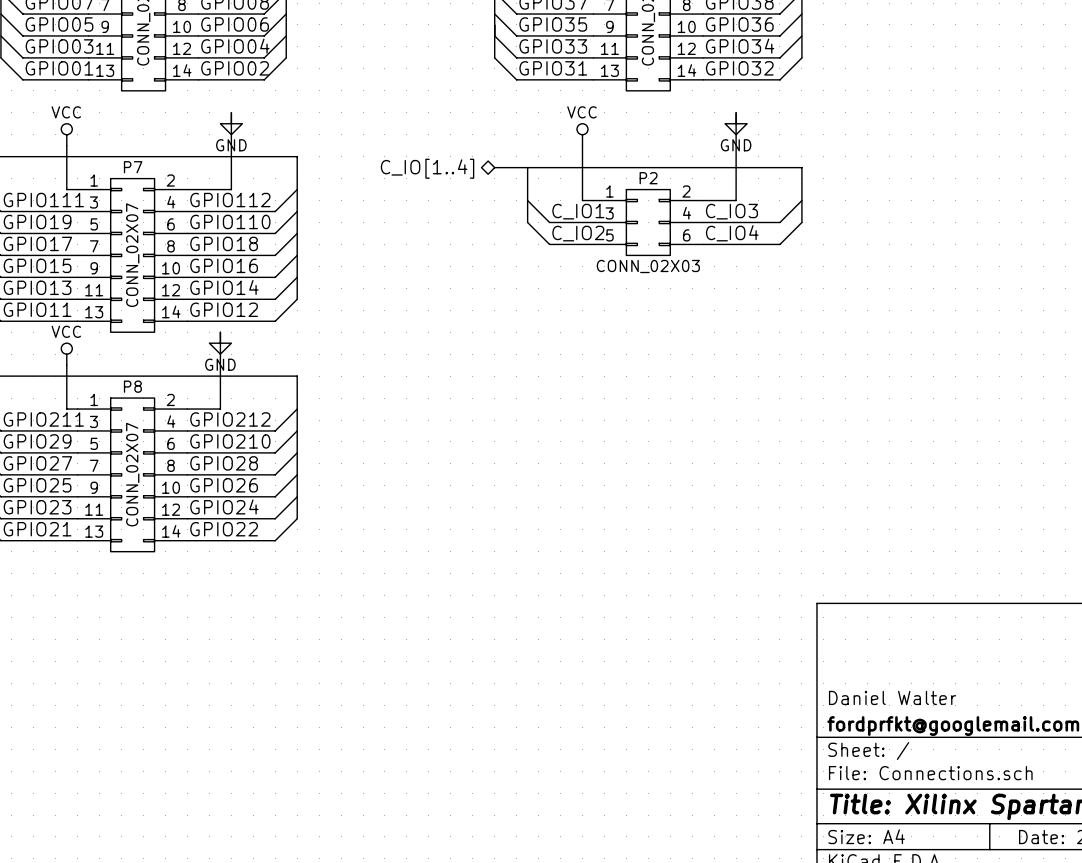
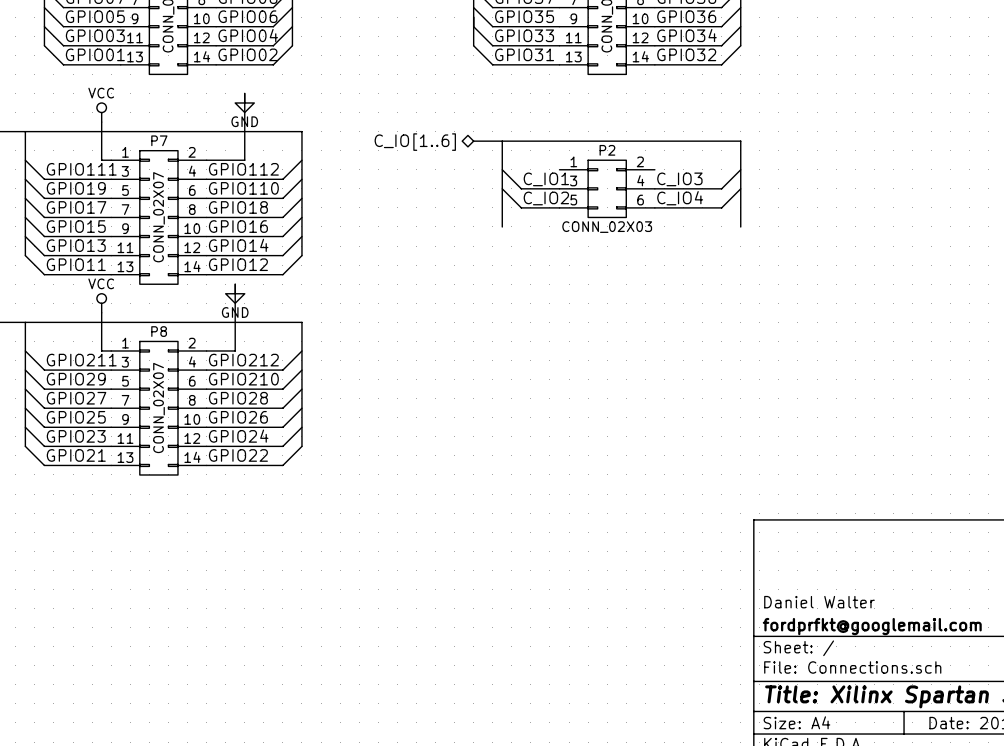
wire: (736, 112) (736, 200) (703, 200) -> none
power symbol: GND (736, 123) -> none
power symbol: VCC (582, 134) -> none
wire: (582, 145) (582, 200) (593, 200) -> none
hierarchical label: C_IO[1..4] (427, 168) -> C_IO[1..6] (415, 142)
bus: none -> (502, 188) (502, 226)
bus: none -> (740, 188) (740, 226)

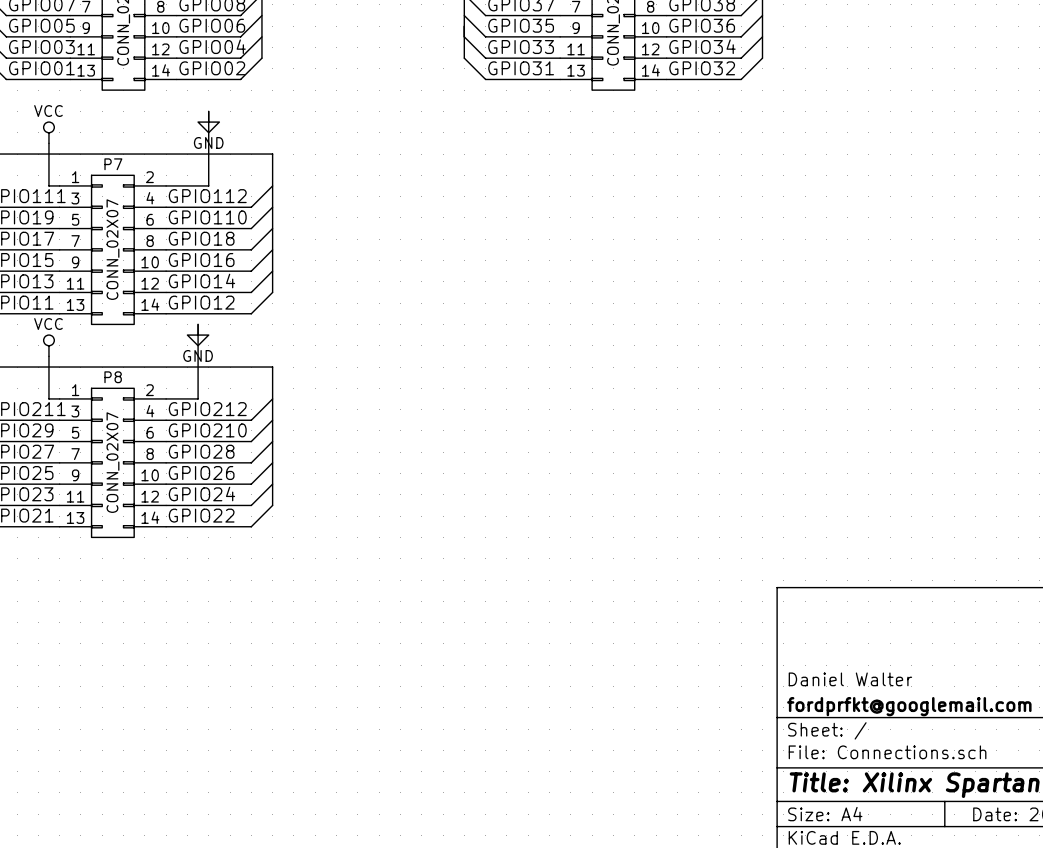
bus: (473, 141) (740, 141) (740, 226) -> none
bus: (502, 141) (502, 226) -> none
hierarchical label: C_IO[1..6] (415, 142) -> none
wire: (502, 169) (521, 188) (559, 188) -> none
wire: (740, 169) (721, 188) (654, 188) -> none
label: C_IO1 (546, 179) -> none
label: C_IO3 (679, 179) -> none
wire: (502, 188) (521, 207) (559, 207) -> none
P2: CONN_02X03 (607, 188) -> none
wire: (740, 188) (721, 207) (654, 207) -> none
label: C_IO2 (546, 198) -> none
label: C_IO4 (680, 198) -> none

